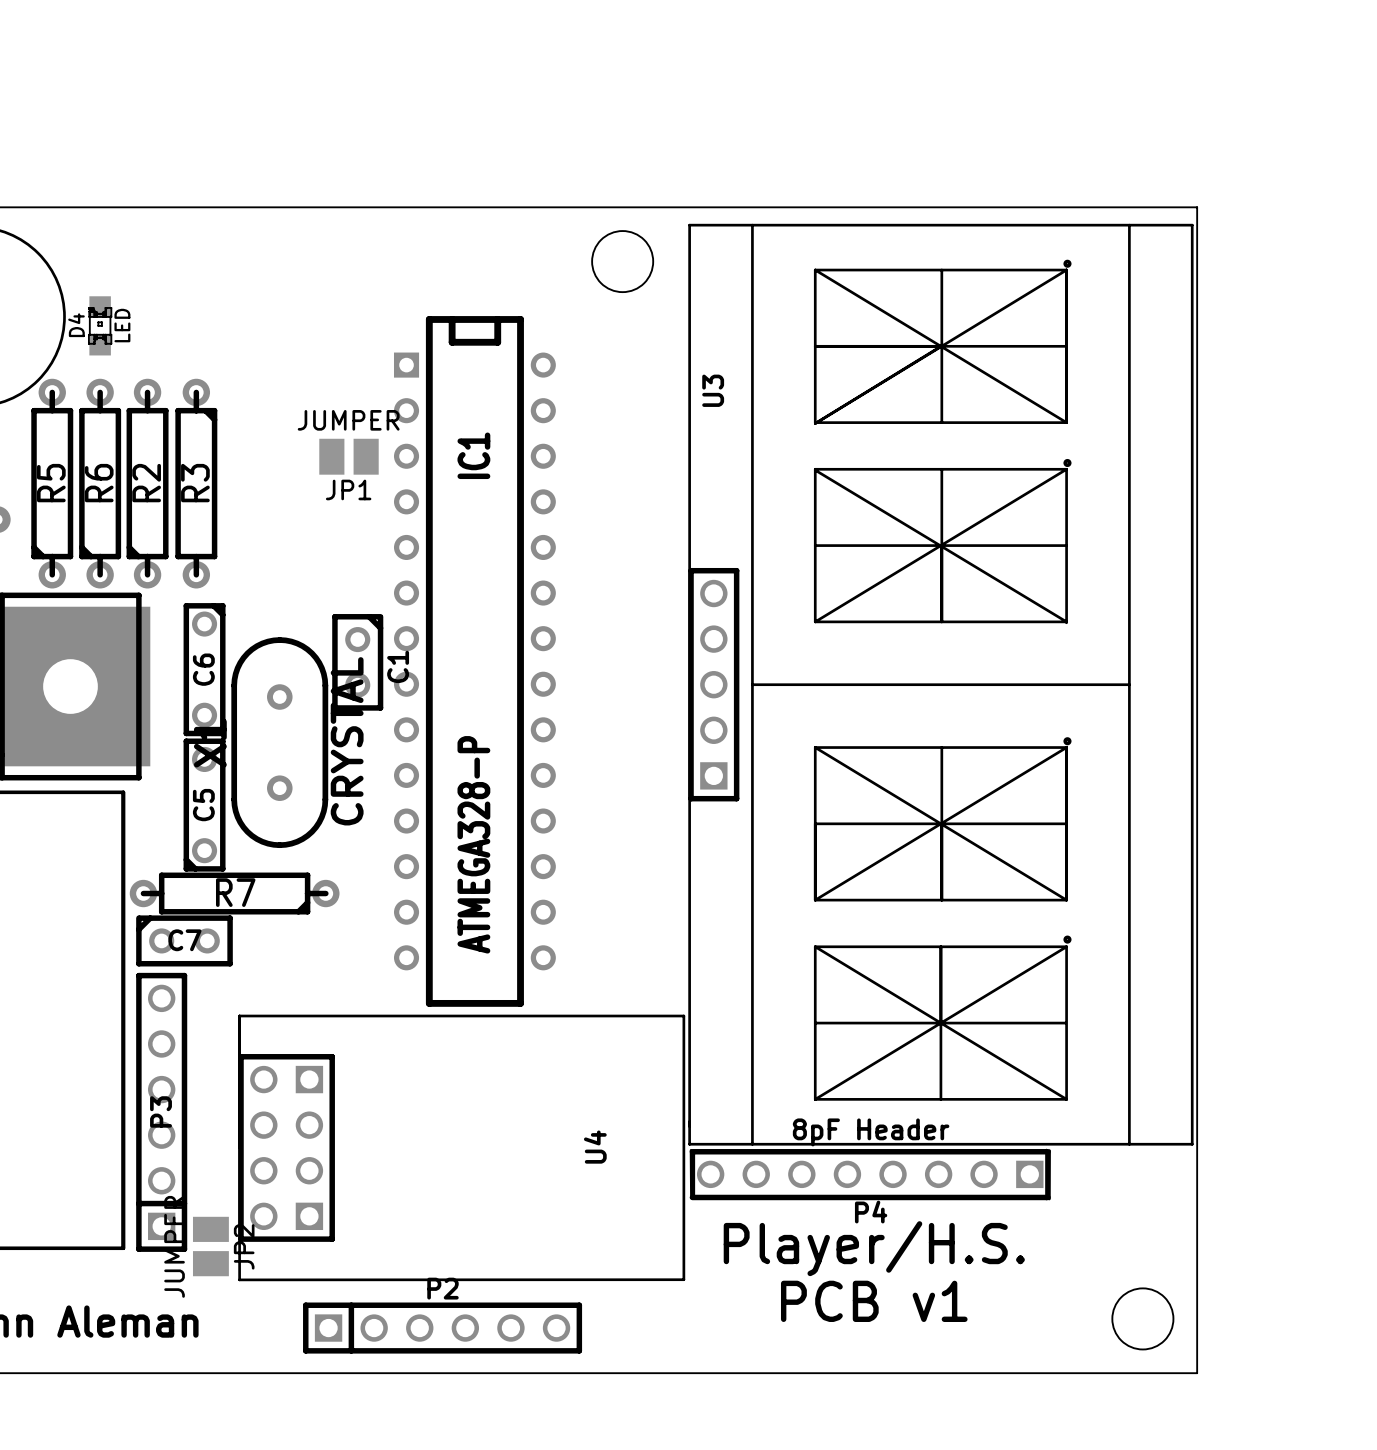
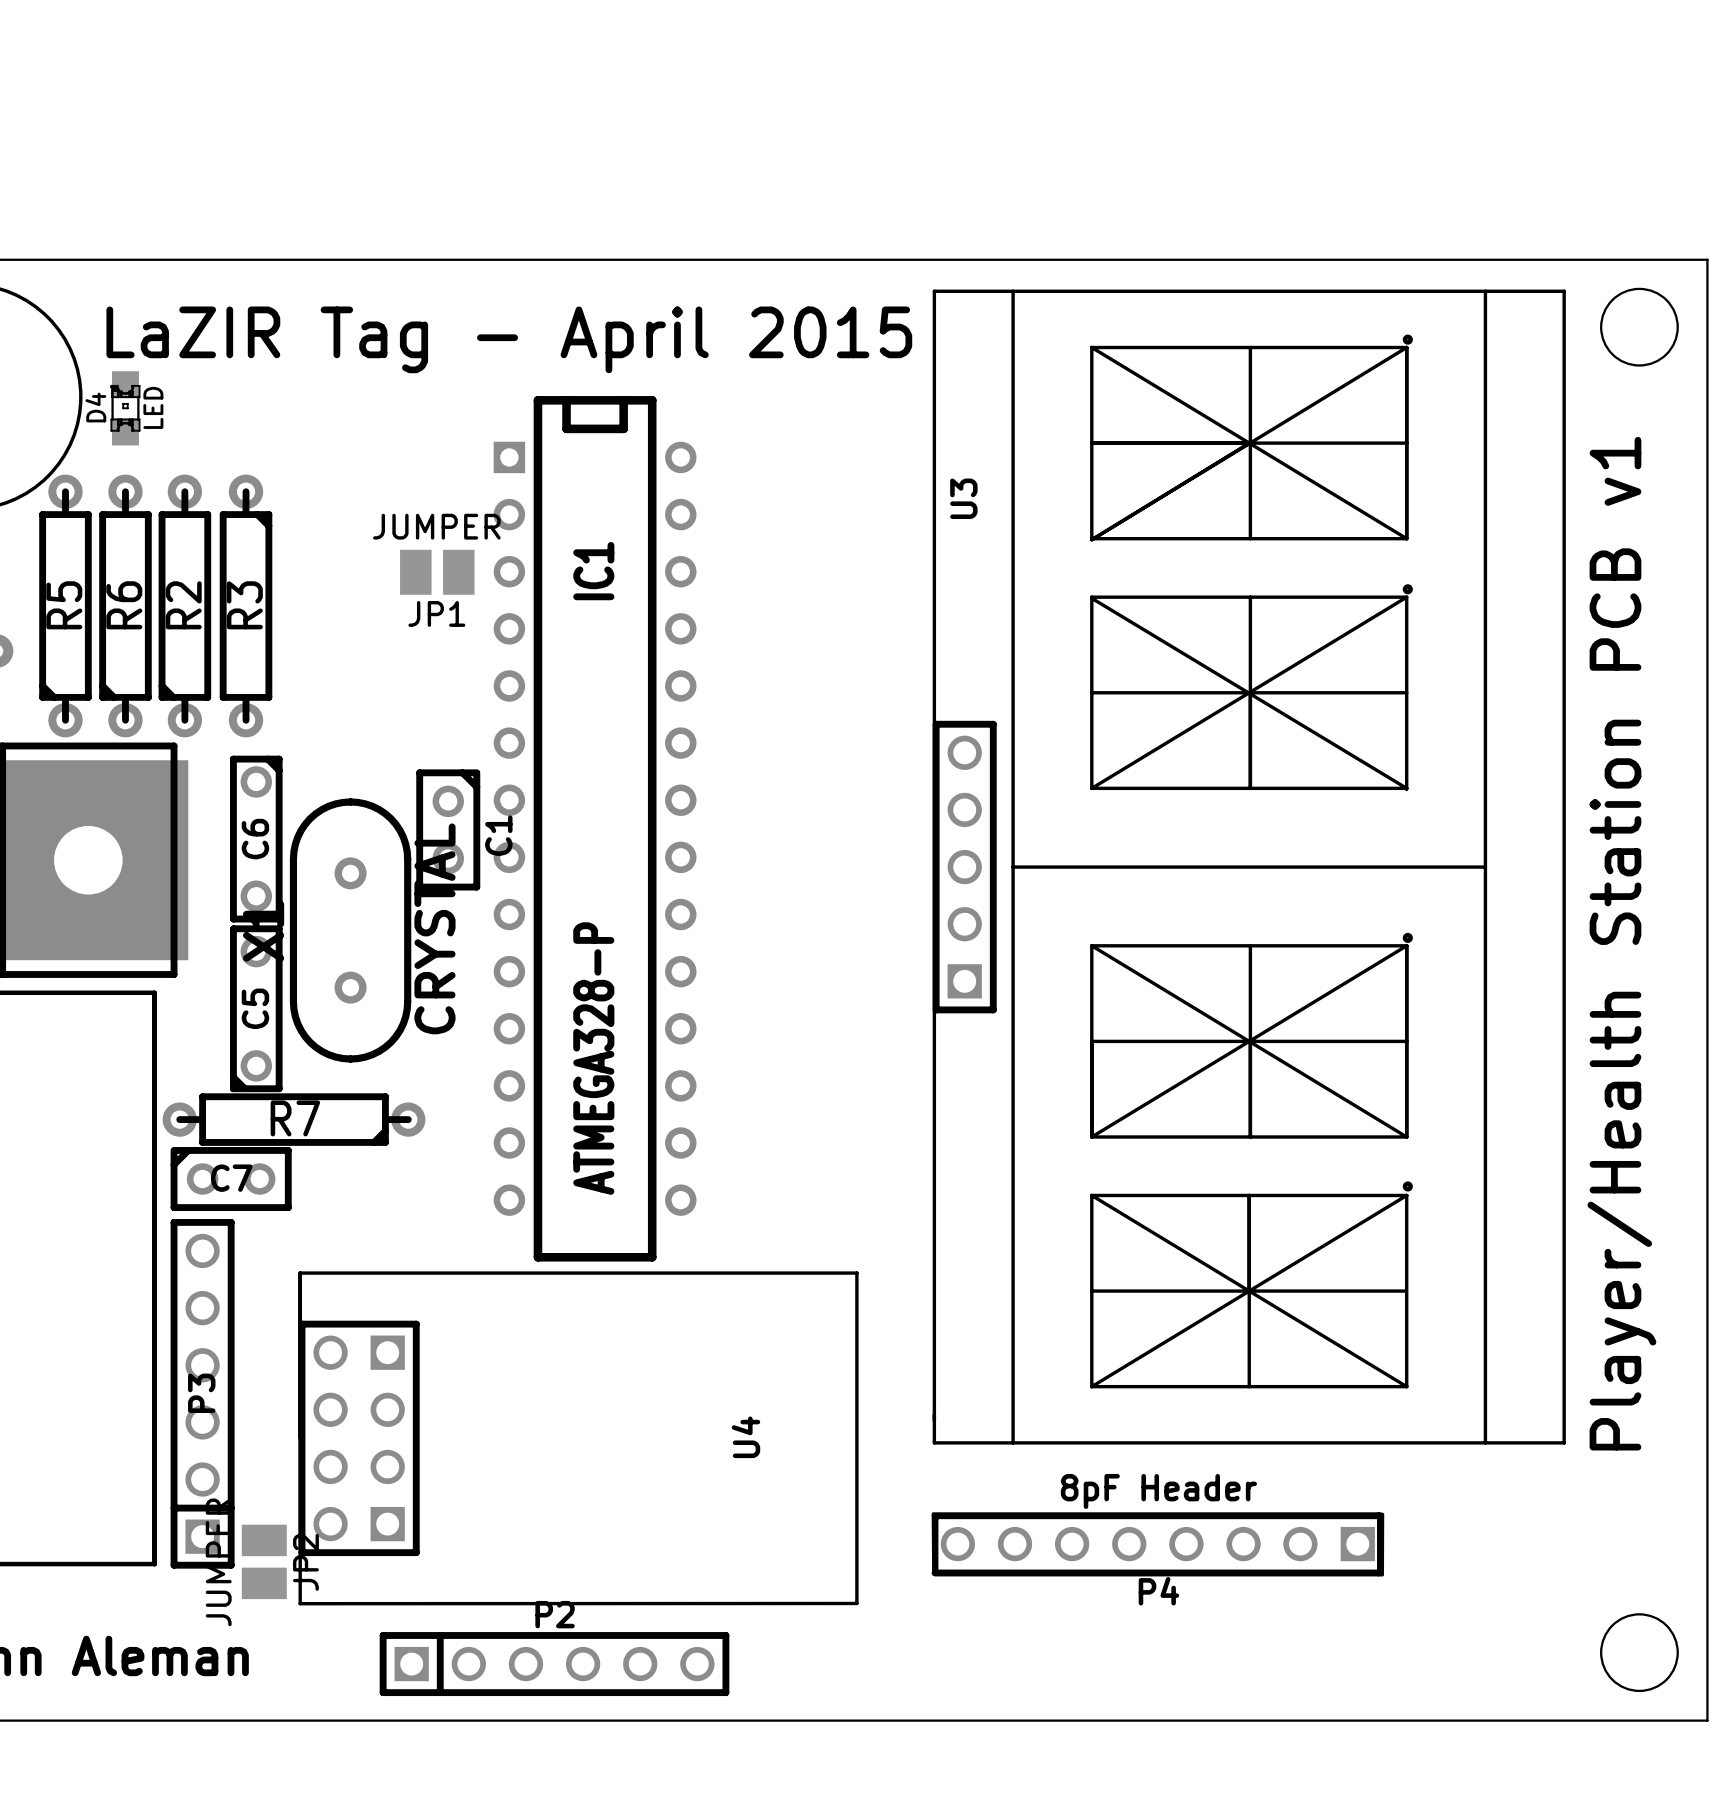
board edge: (1197, 207) (1197, 1373) -> (1500, 259) (1707, 259) (1707, 1720) (1500, 1720)
round board edge: none -> [1600, 287, 1679, 367]
round board edge: [591, 230, 655, 294] -> none
text: none -> LaZIR Tag - April 2015 (509, 339)
U3 position: (940, 684) -> (1249, 867)
text: none -> Player/Health Station PCB v1 (1621, 943)
P4 position: (870, 1174) -> (1157, 1544)
text: Player/H.S. (874, 1248) -> none
text: PCB v1 (874, 1301) -> none
round board edge position: (1142, 1318) -> (1639, 1652)

